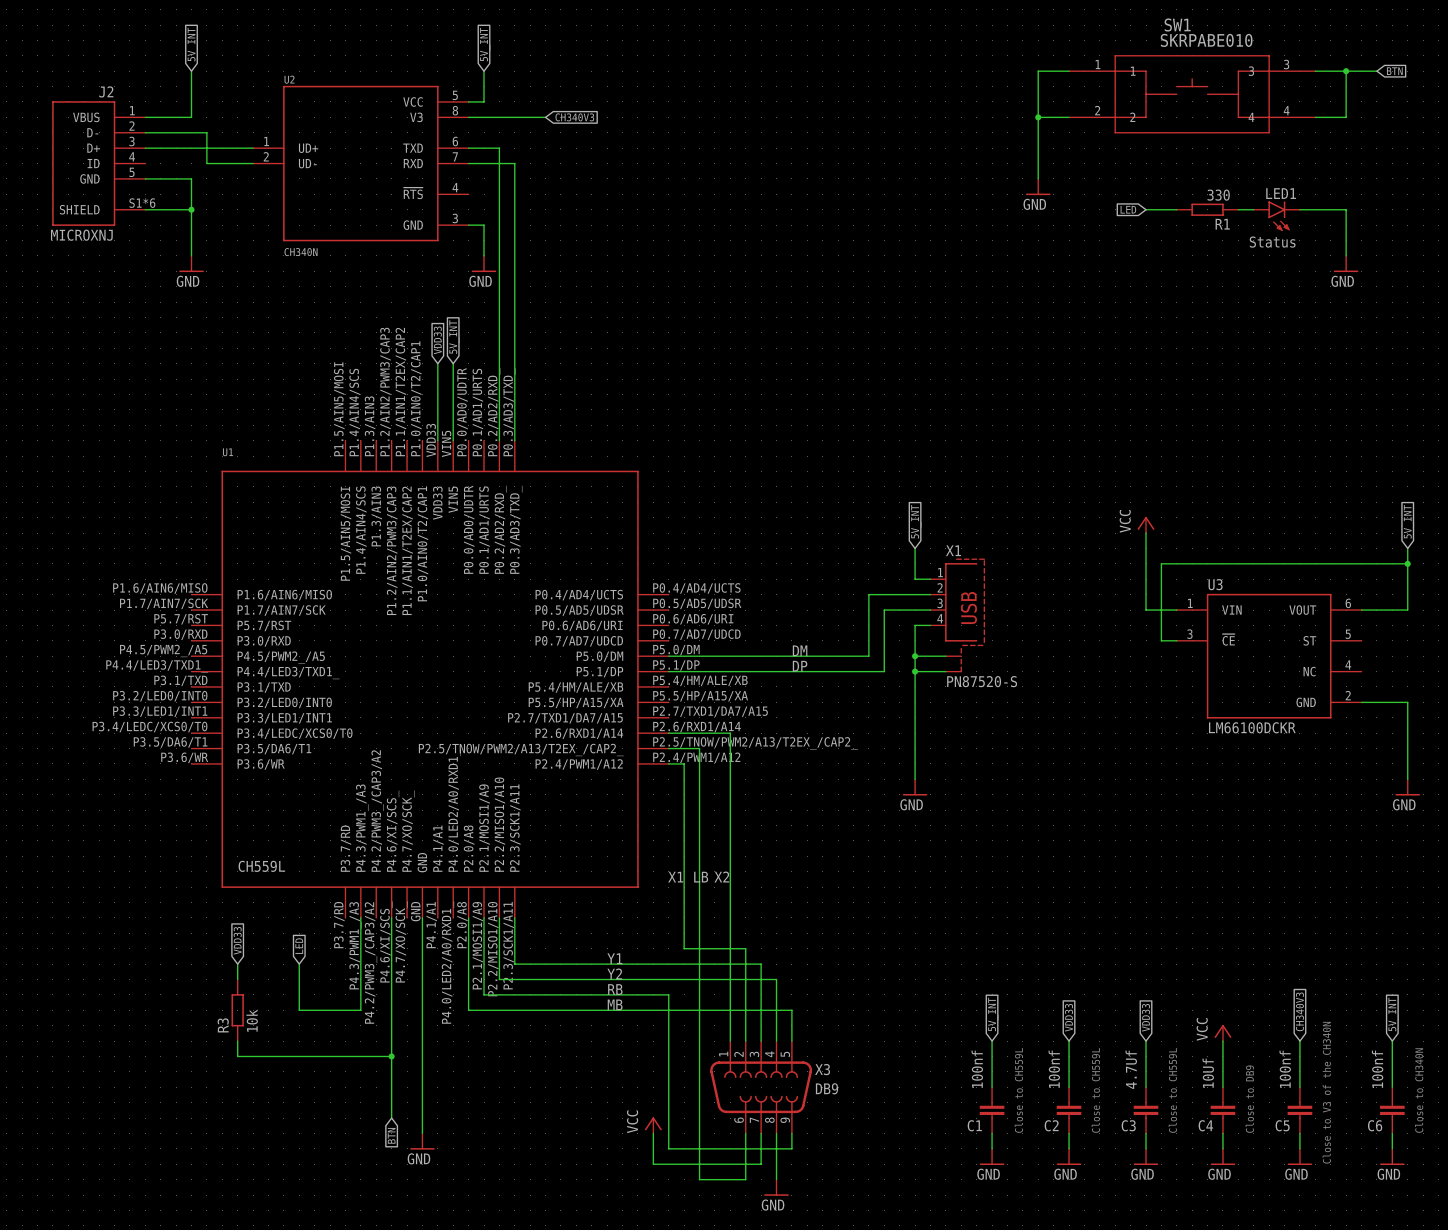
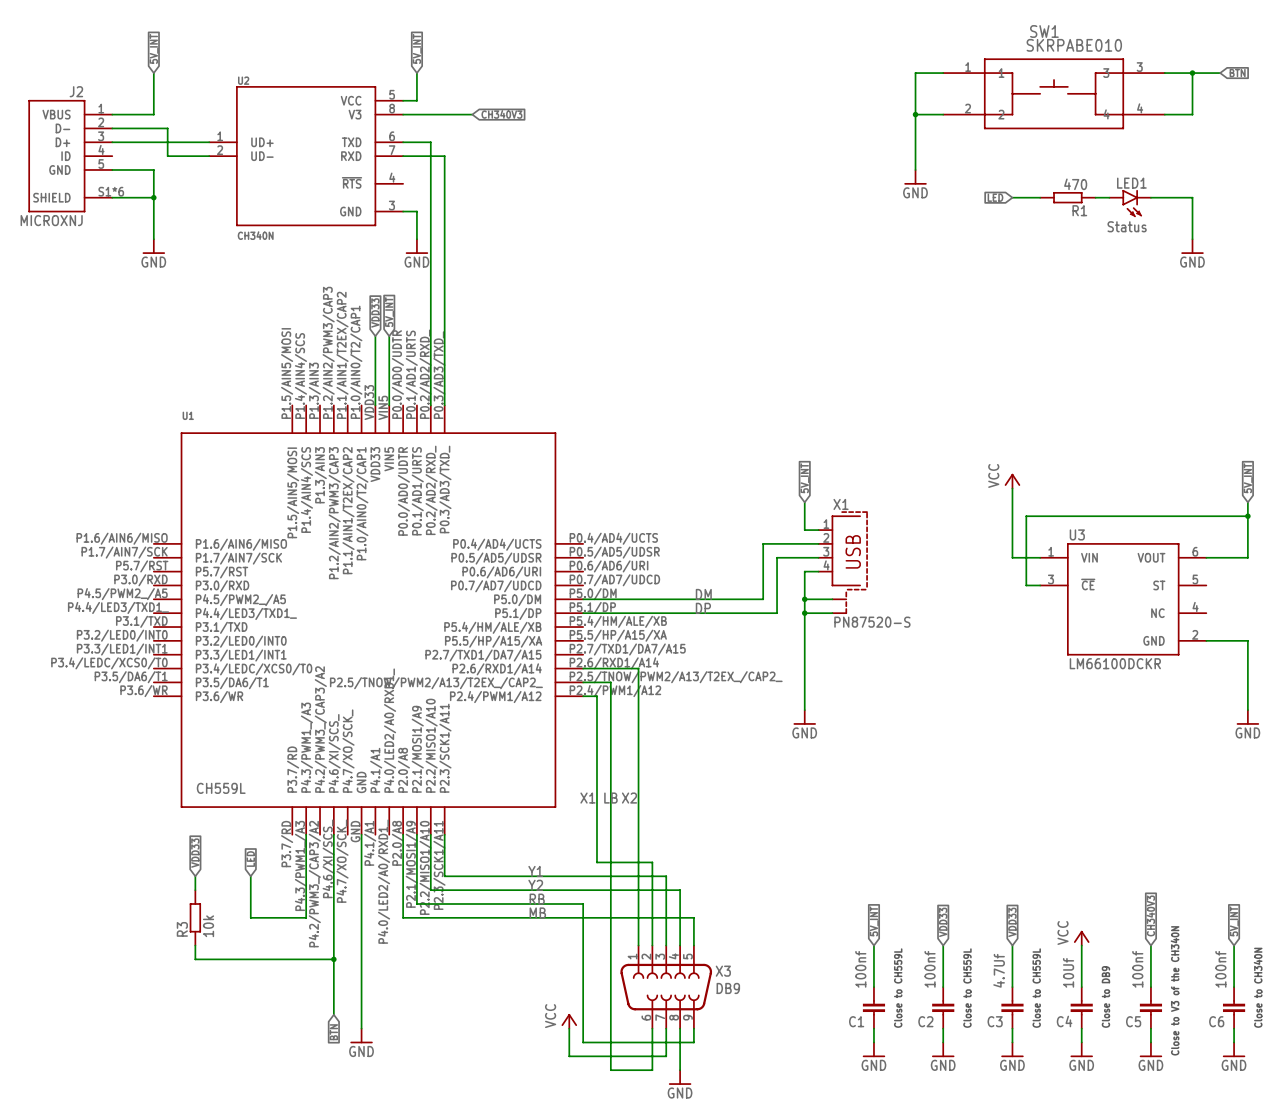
R1 value: 330 (1218, 195) -> 470 (1075, 184)

